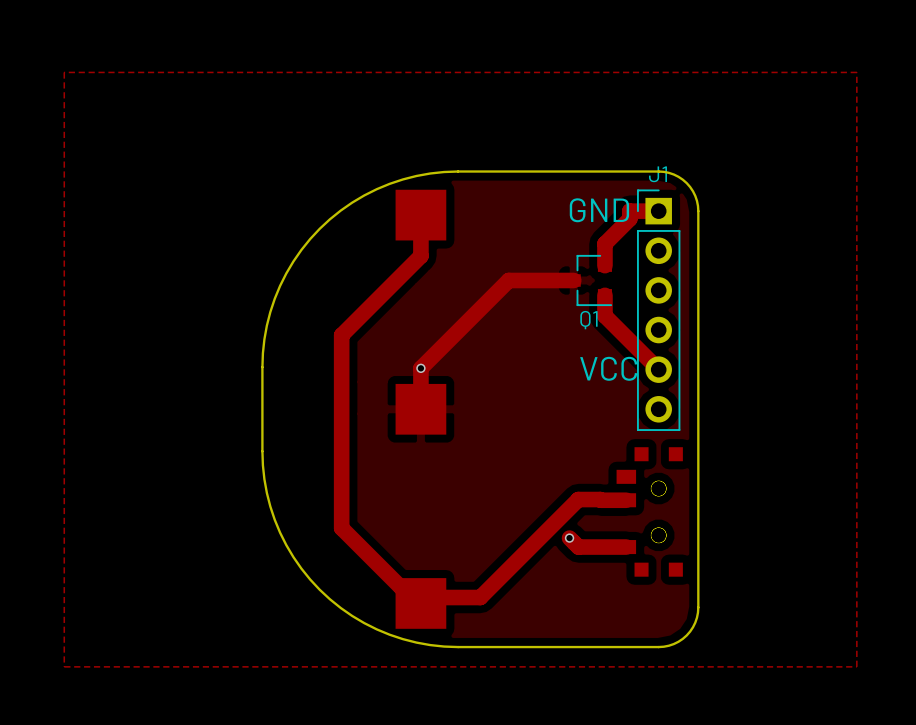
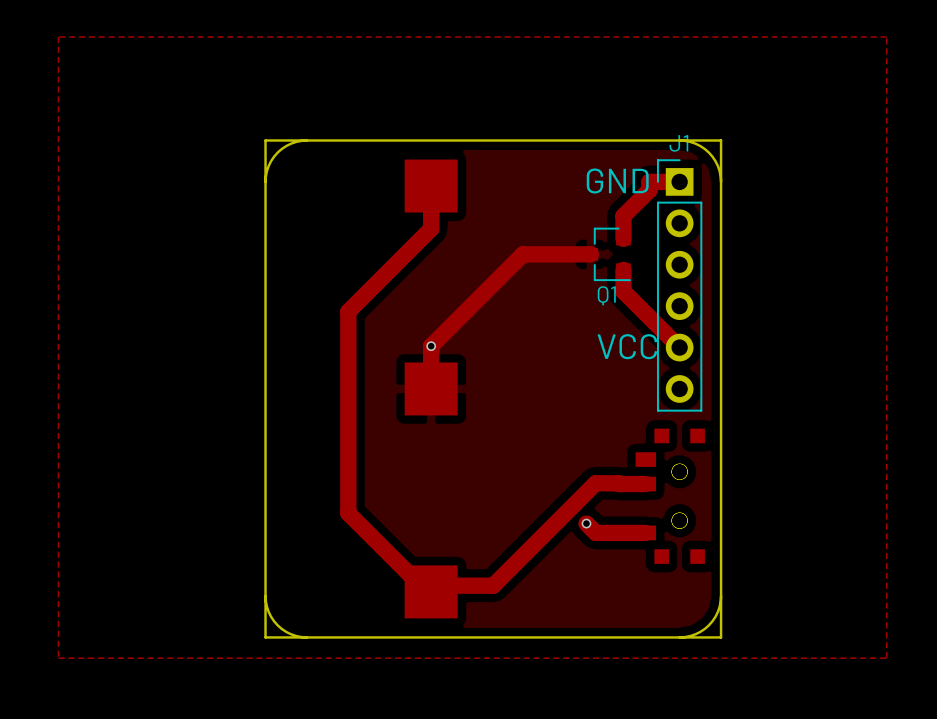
board edge: none -> (306, 140) (291, 143) (277, 152) (268, 166) (265, 181)
board edge: (458, 171) (416, 175) (389, 183) (352, 202) (319, 228) (293, 261) (274, 298) (266, 325) (262, 367) -> (470, 140) (265, 140) (265, 345)
board edge: none -> (679, 140) (721, 140) (721, 181)
board edge: (262, 451) (266, 493) (280, 532) (301, 568) (319, 589) (352, 616) (376, 629) (416, 642) (458, 647) -> (265, 432) (265, 637) (470, 637)
board edge: none -> (265, 596) (268, 611) (277, 625) (291, 634) (306, 637)
board edge: none -> (721, 596) (721, 637) (679, 637)

